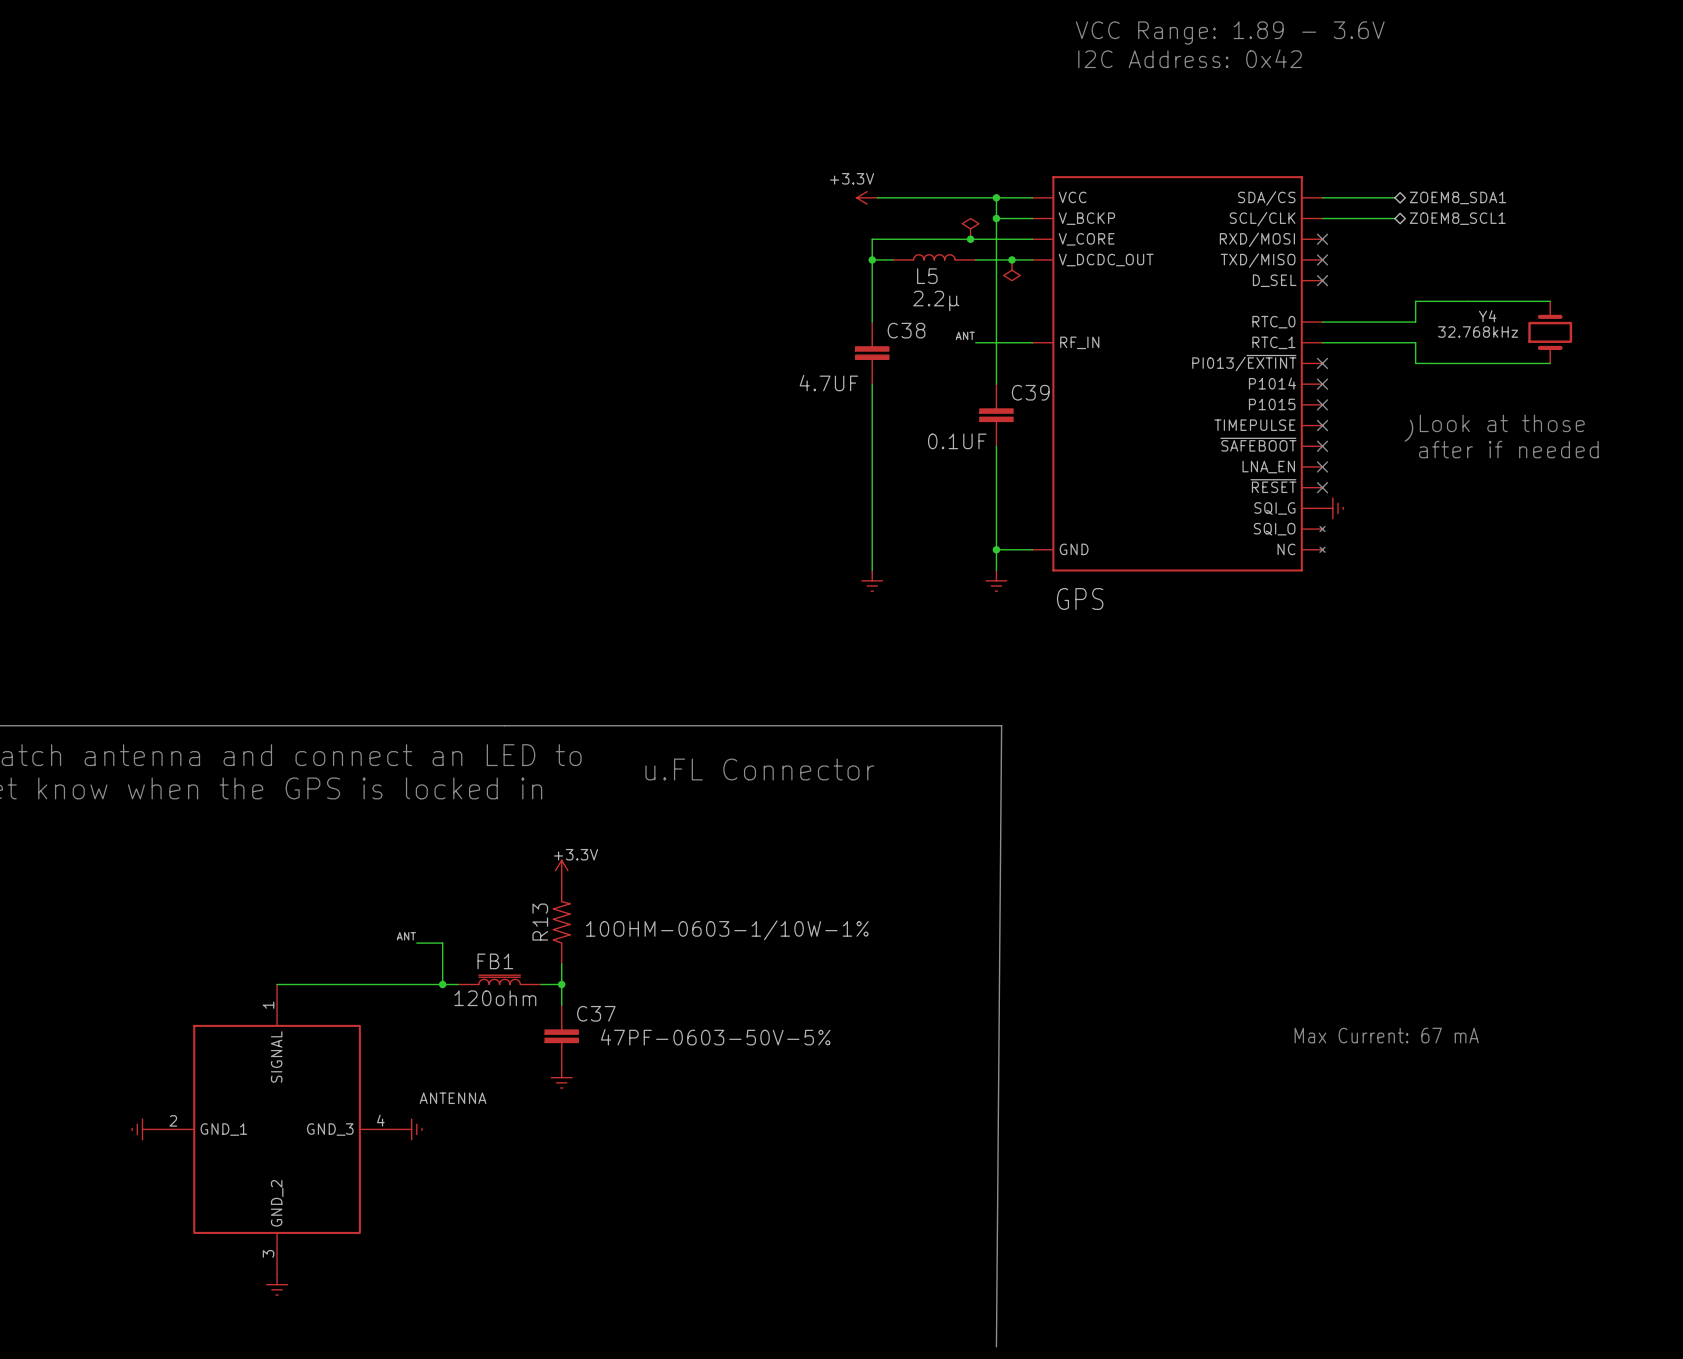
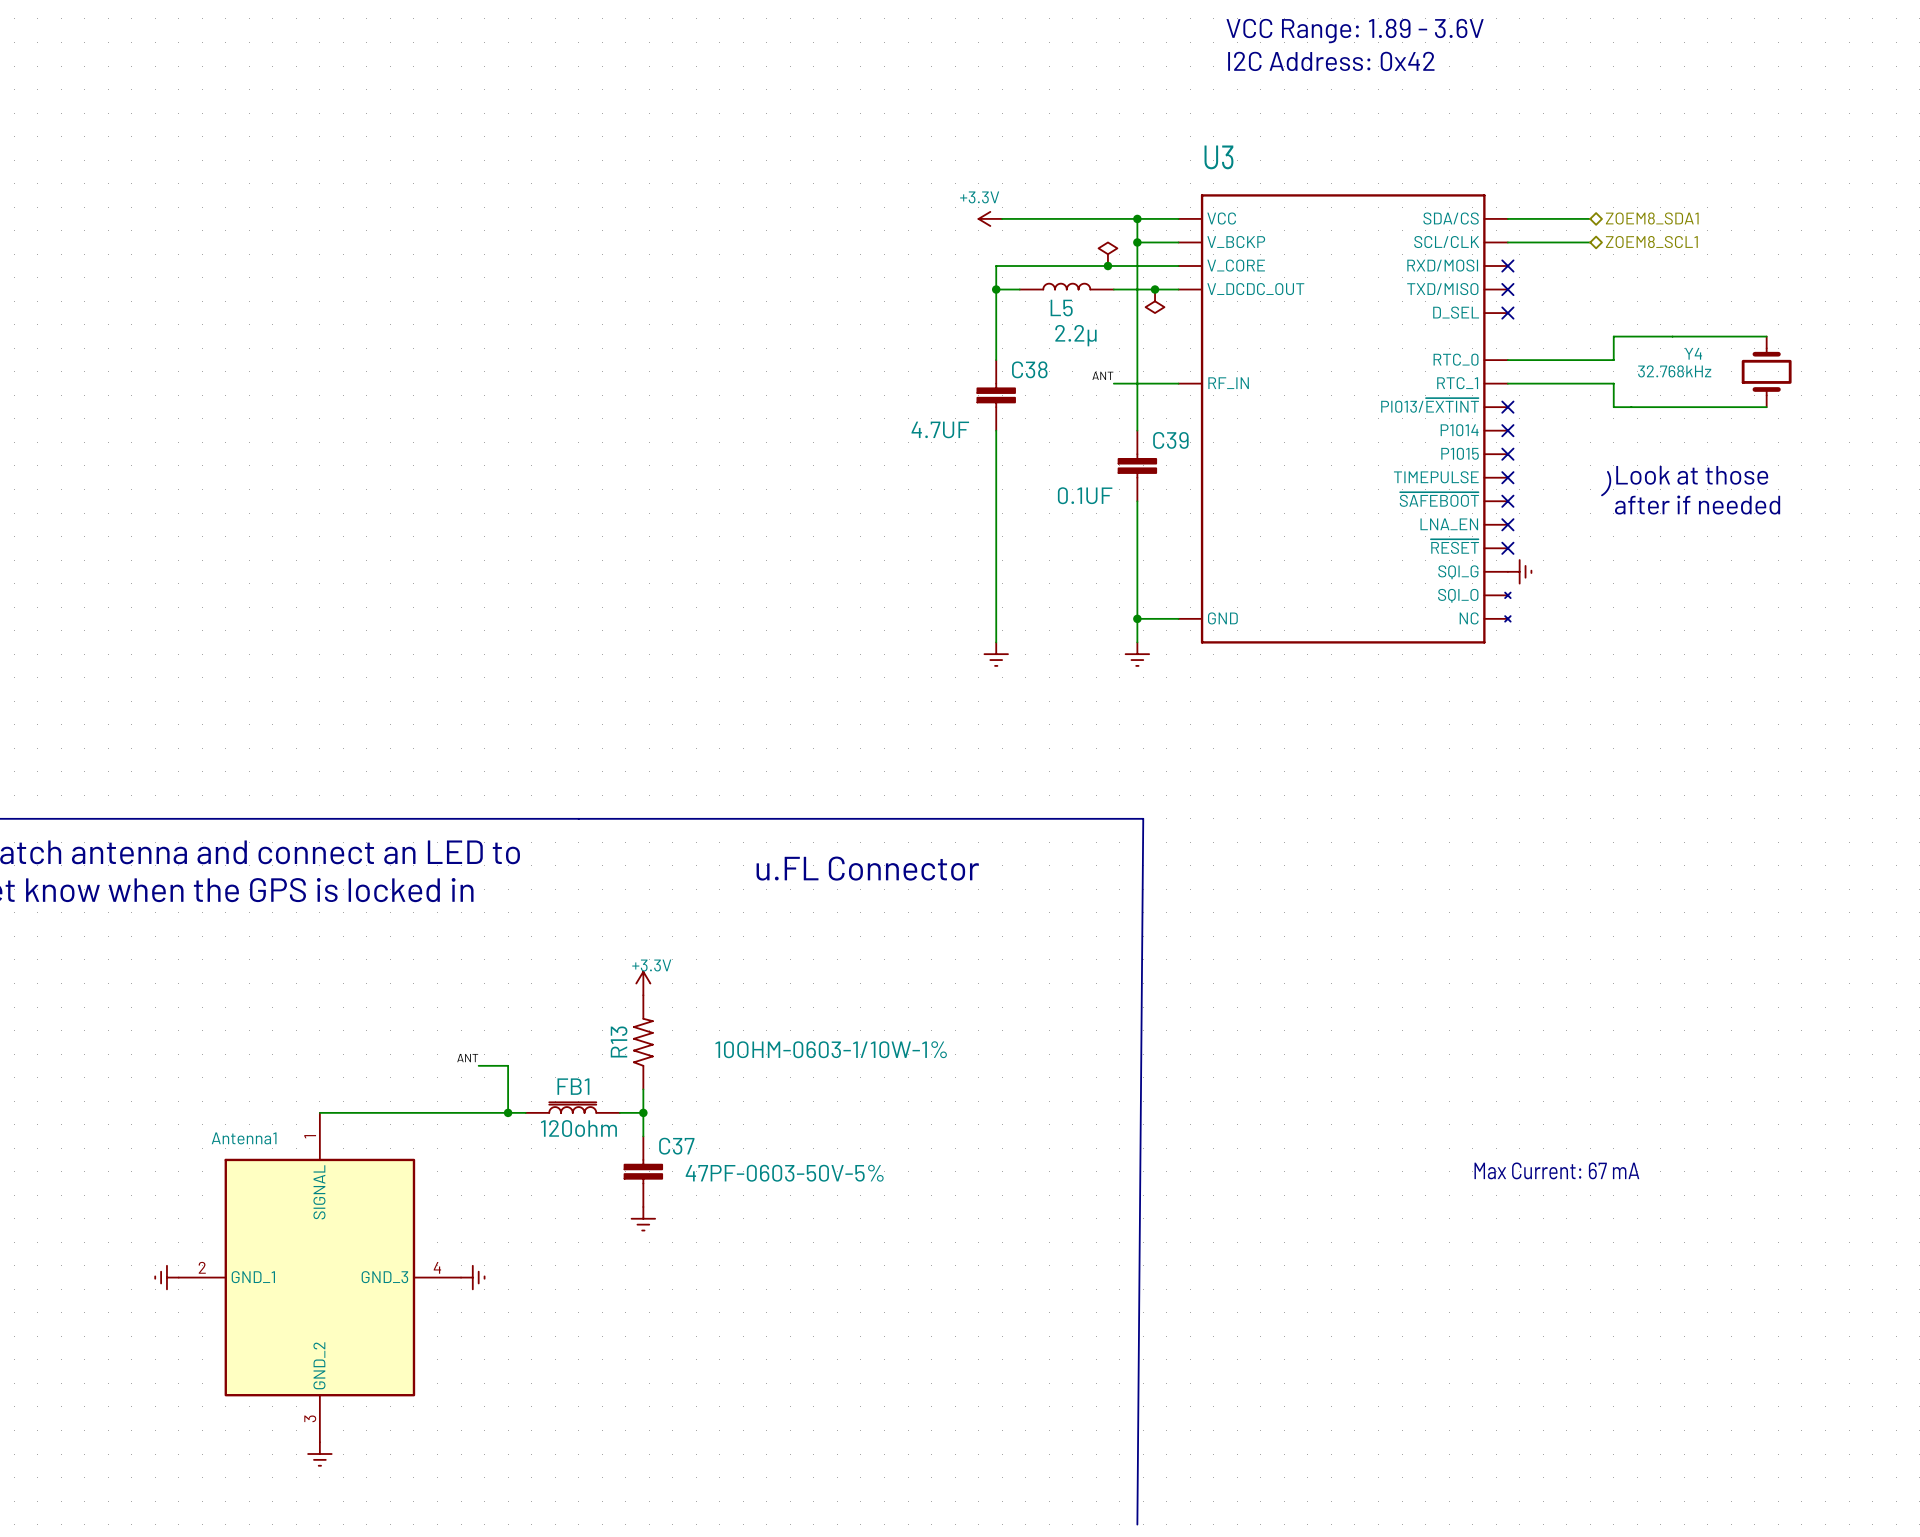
U3 name: none -> U3 (1218, 157)
U3 value: GPS (1080, 598) -> none
Antenna1 name: none -> Antenna1 (244, 1138)
Antenna1 value: ANTENNA (453, 1098) -> none

